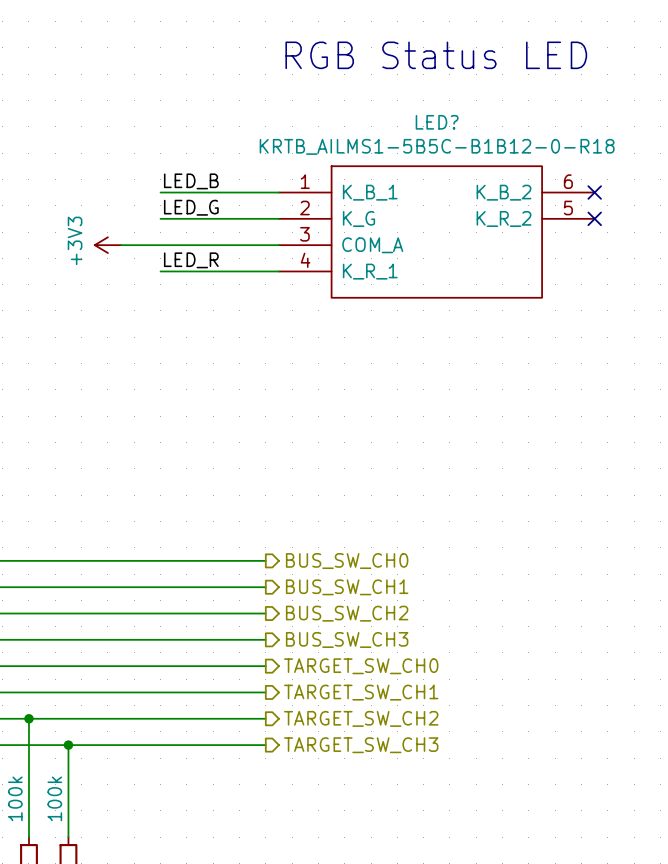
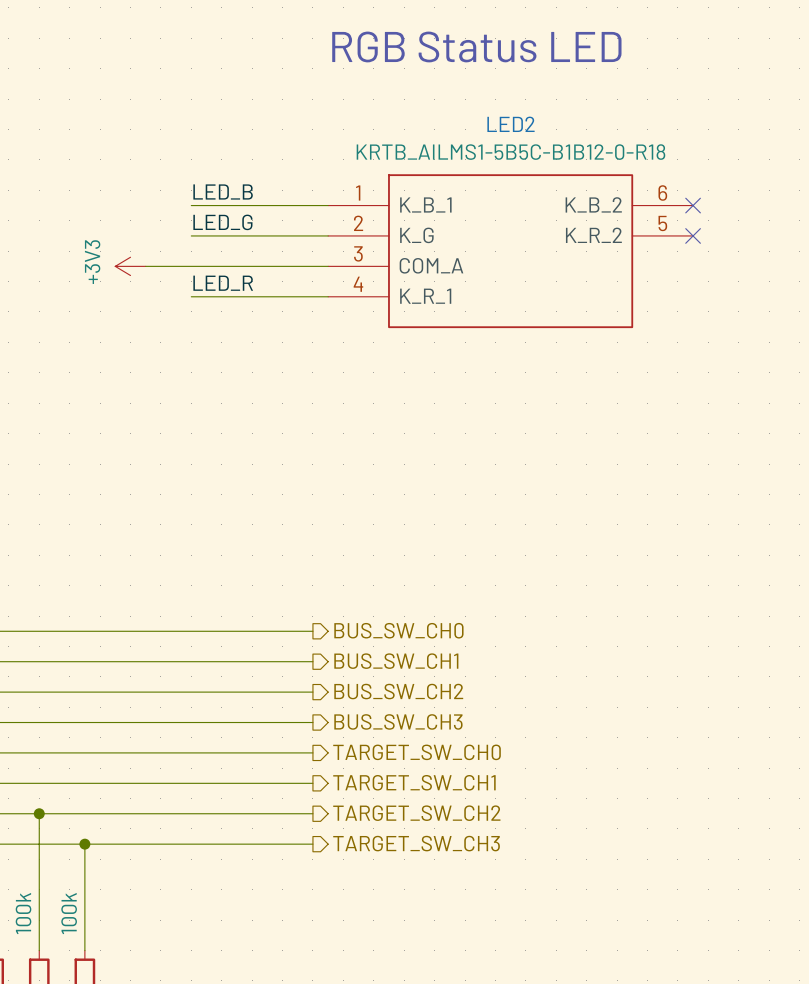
LED? name: LED? (437, 122) -> LED2 (511, 124)

